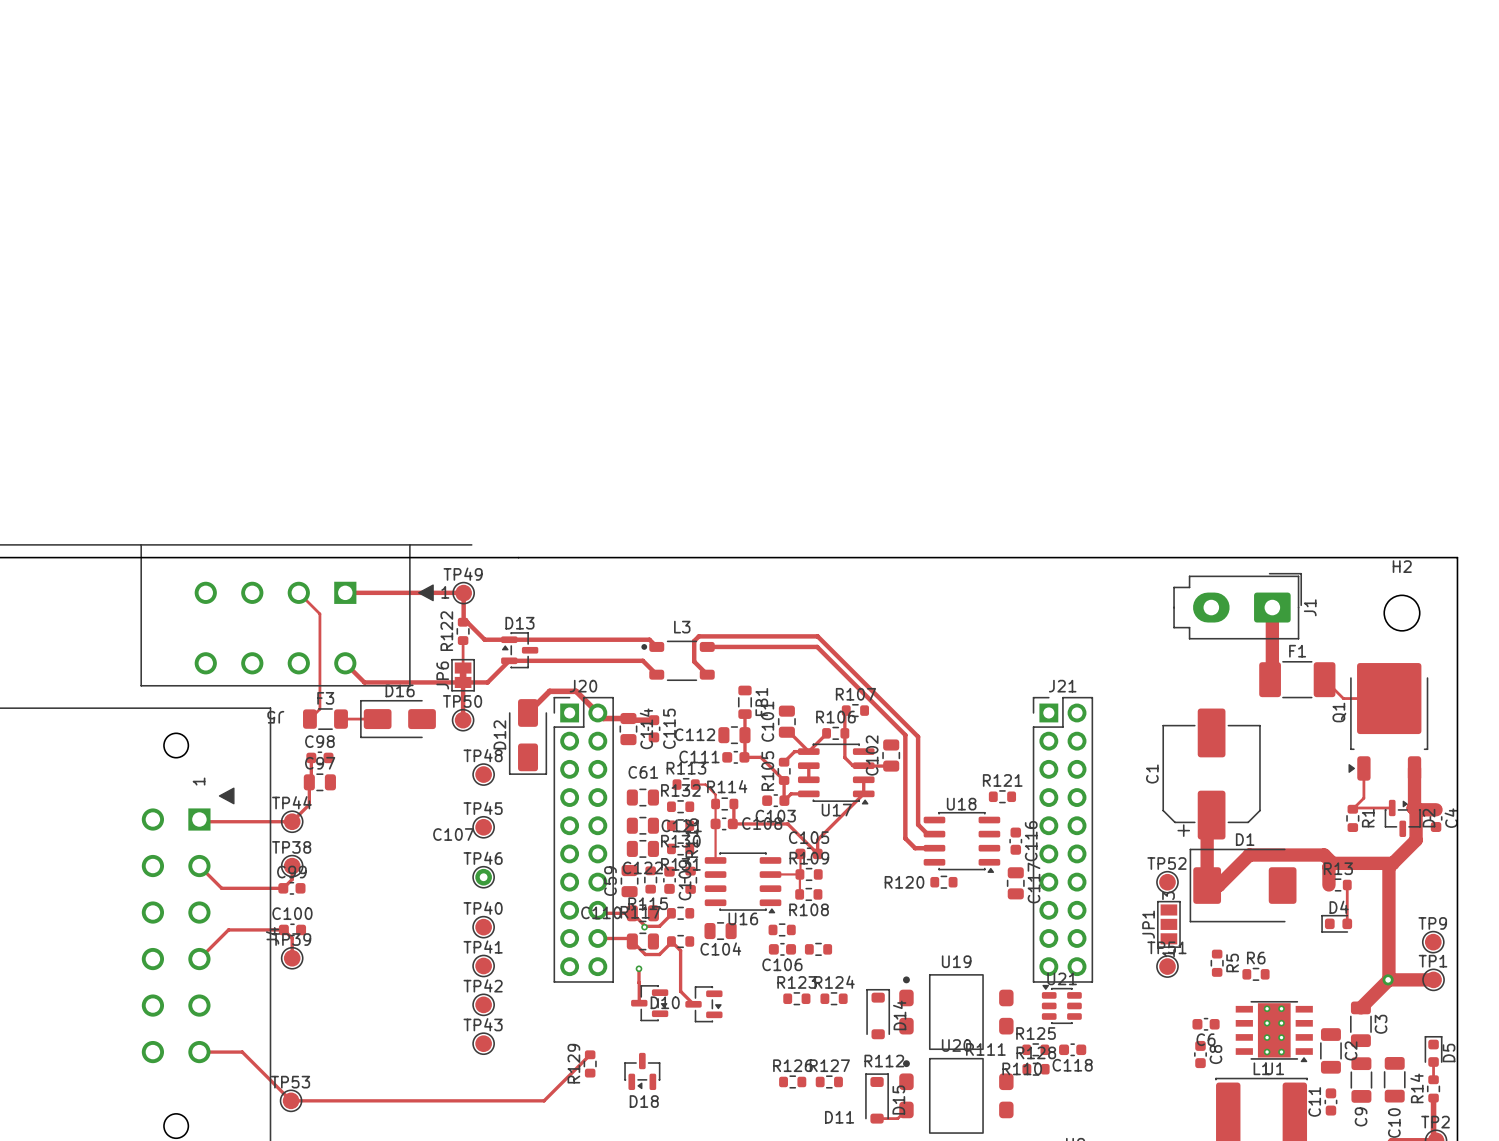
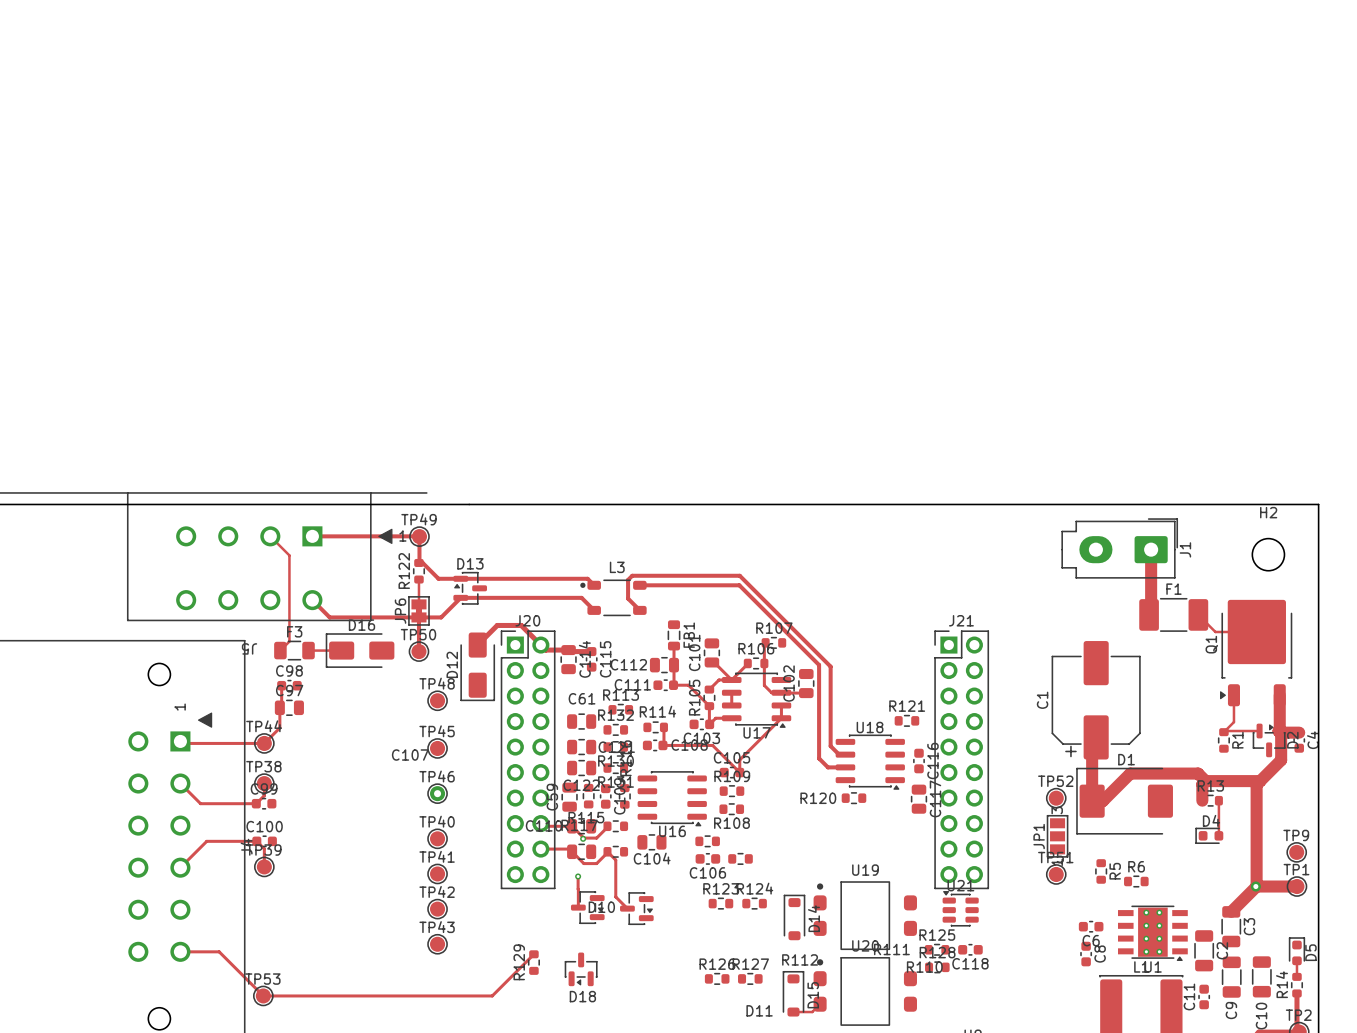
track: (695, 784) (705, 784) (715, 794) (715, 860) -> none
track: (800, 853) (799, 874) -> none
track: (770, 874) (799, 874) -> none
track: (799, 874) (799, 894) -> none

